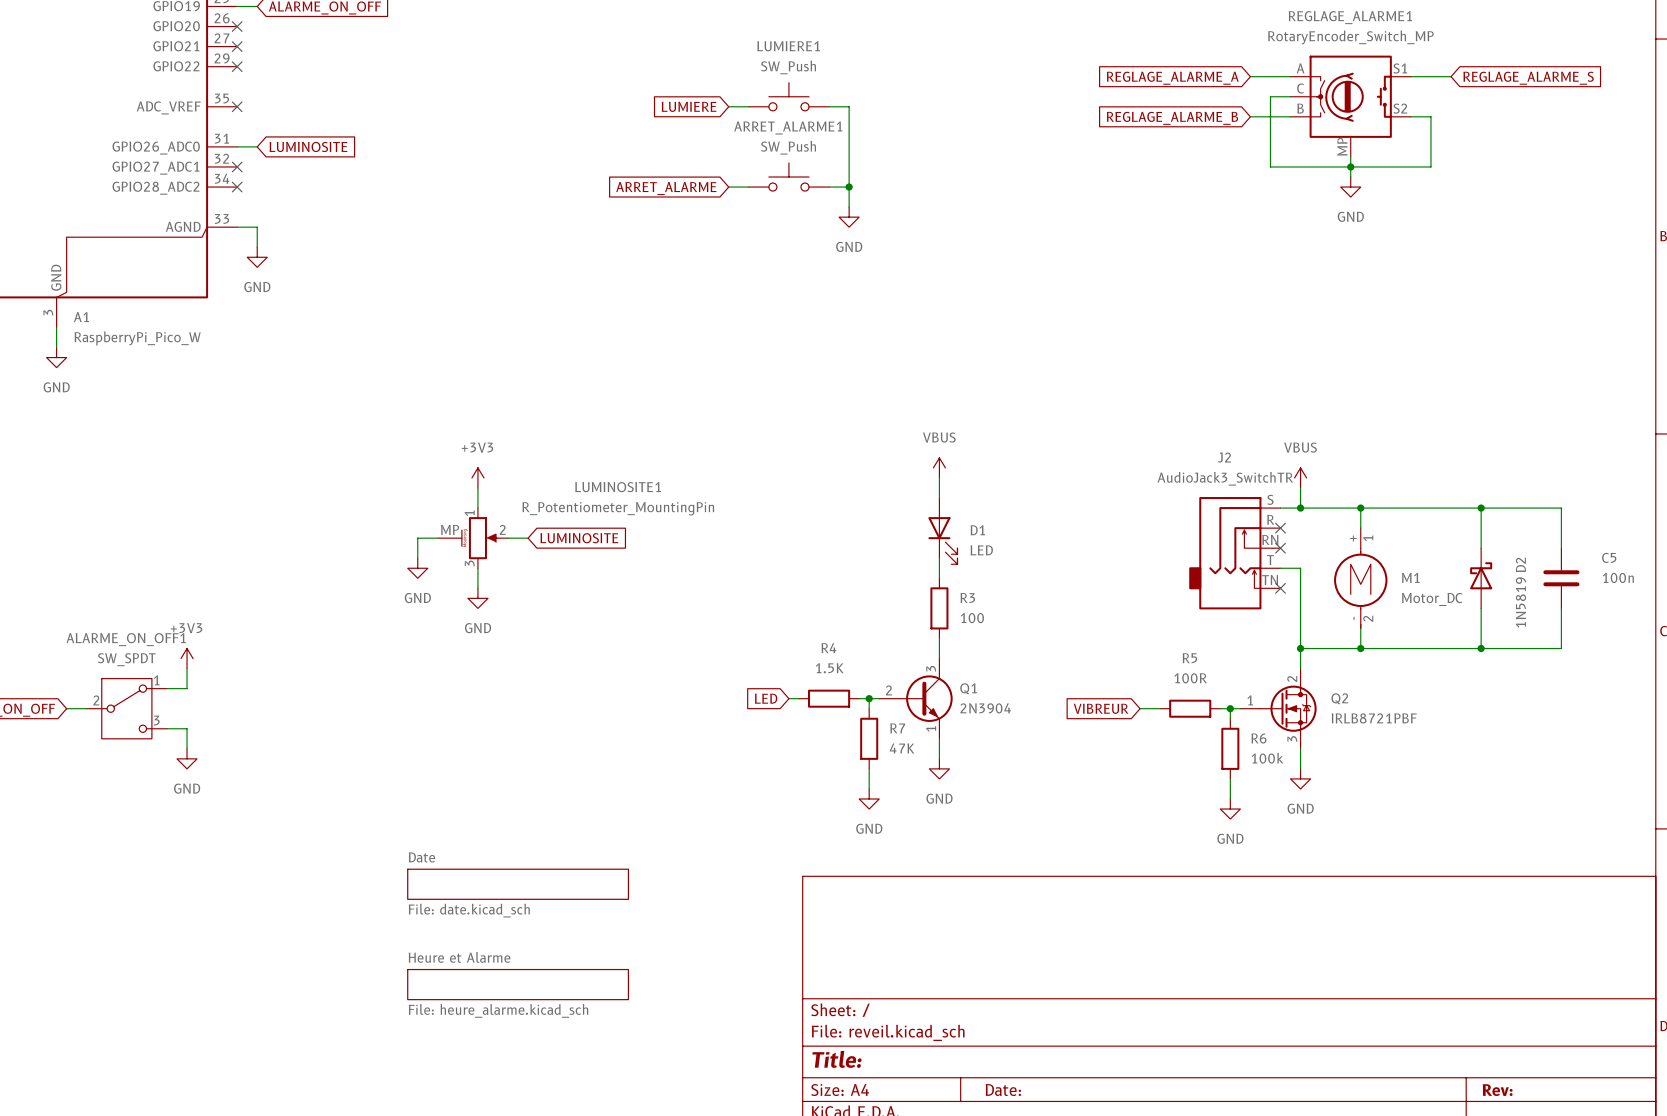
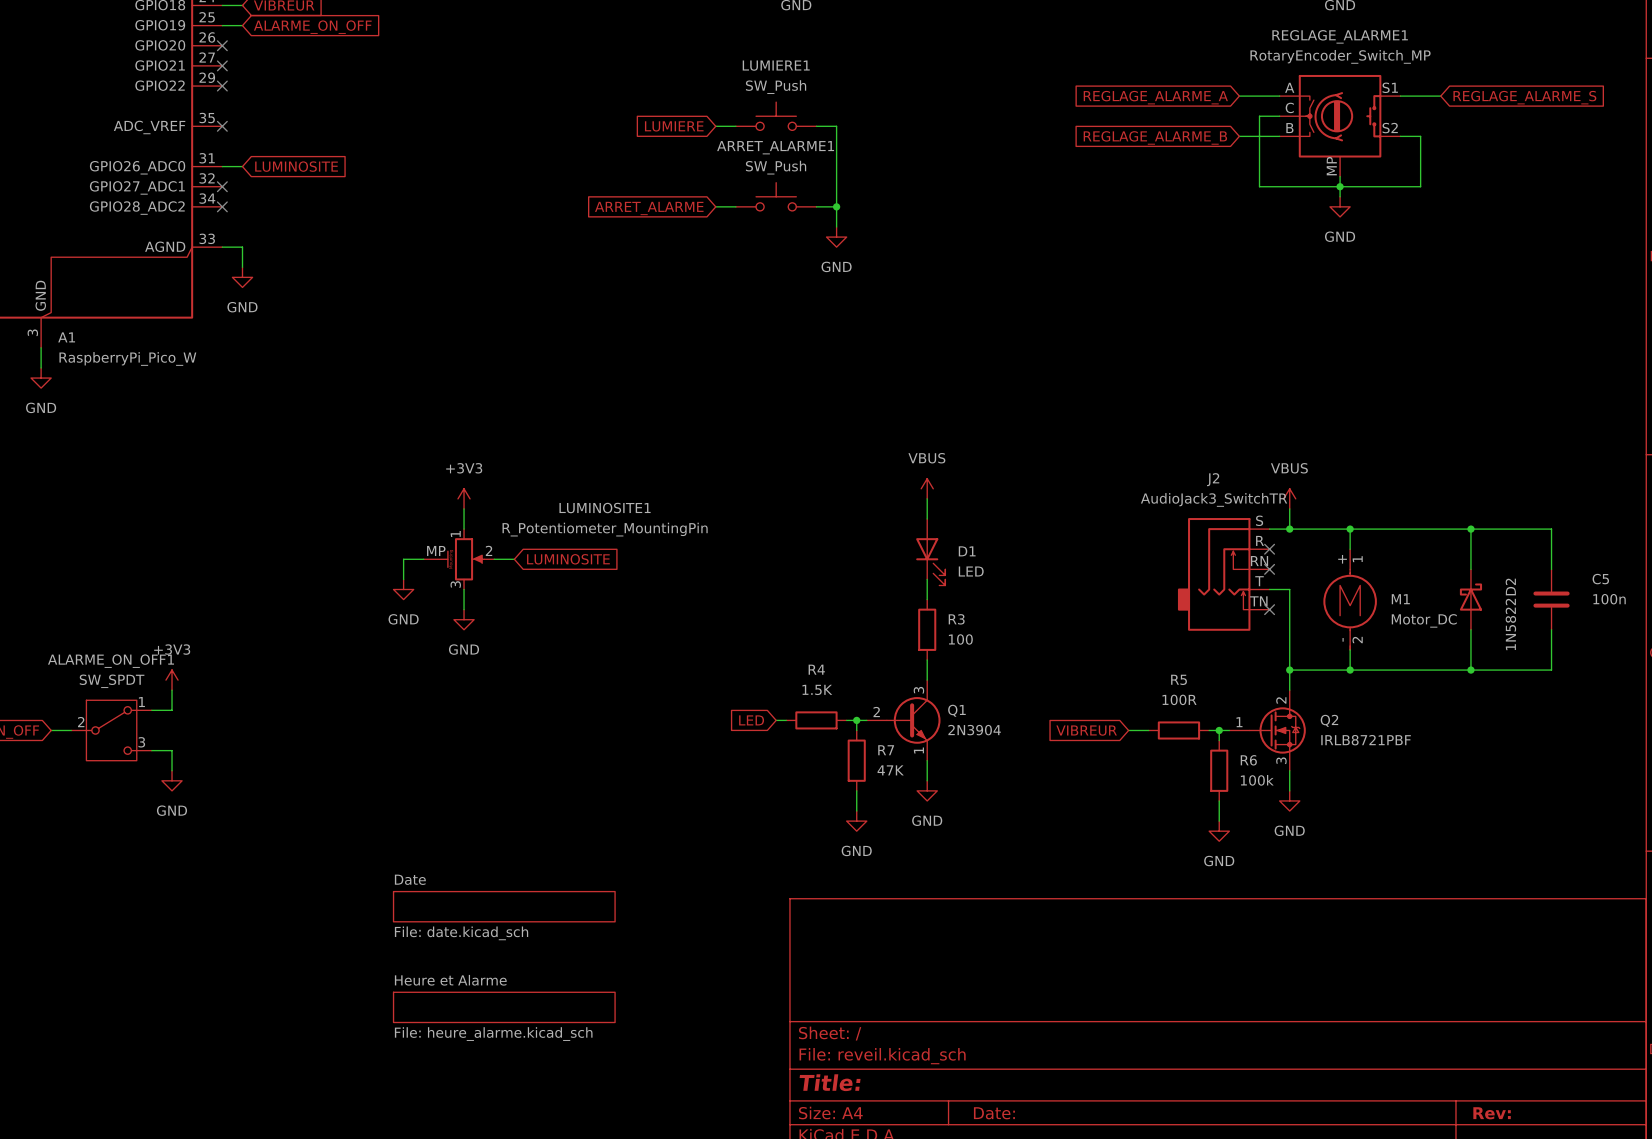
D2 value: 1N5819 (1520, 602) -> 1N5822 (1510, 624)

